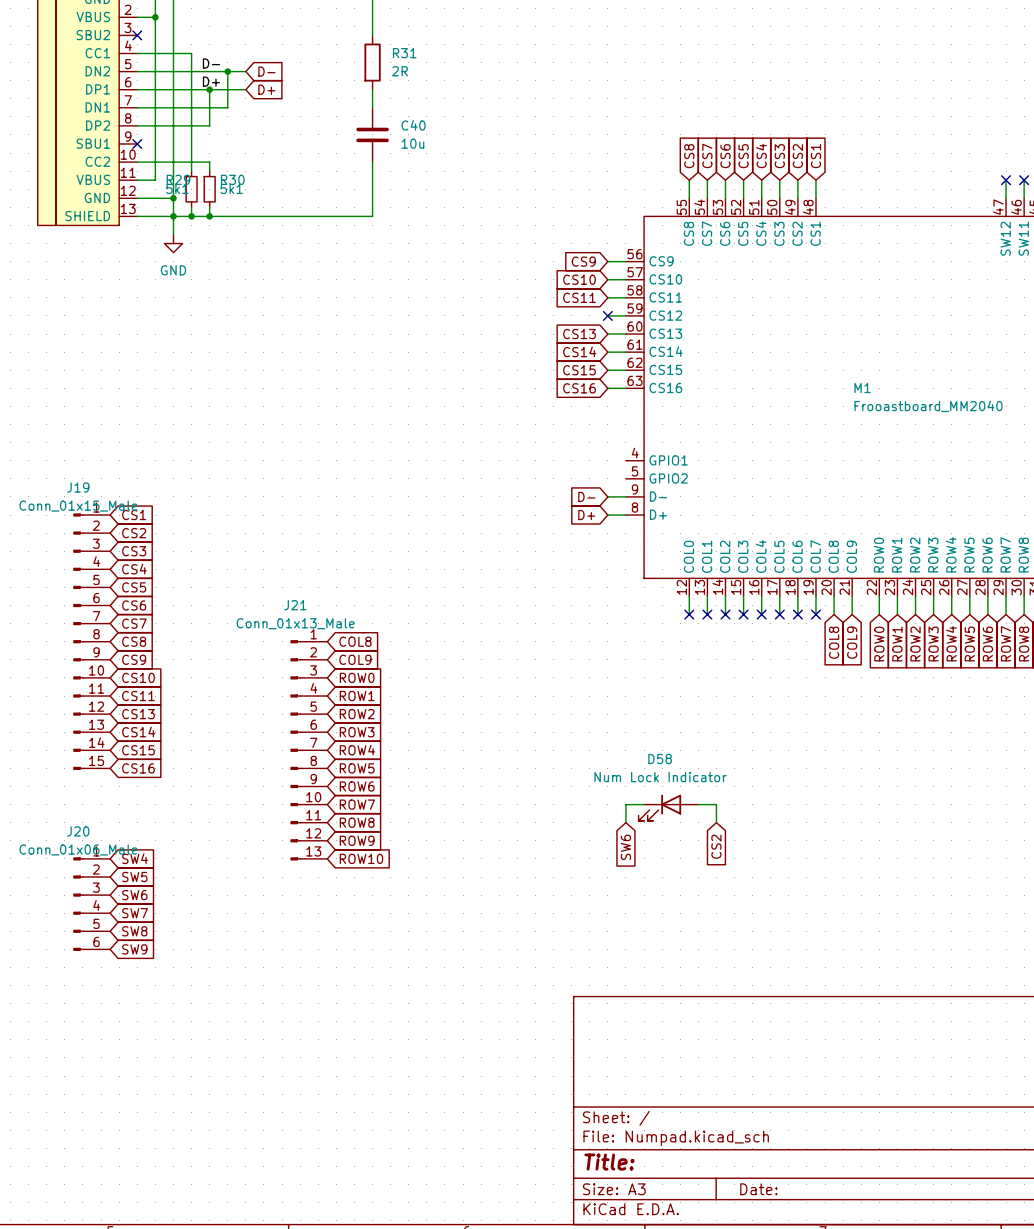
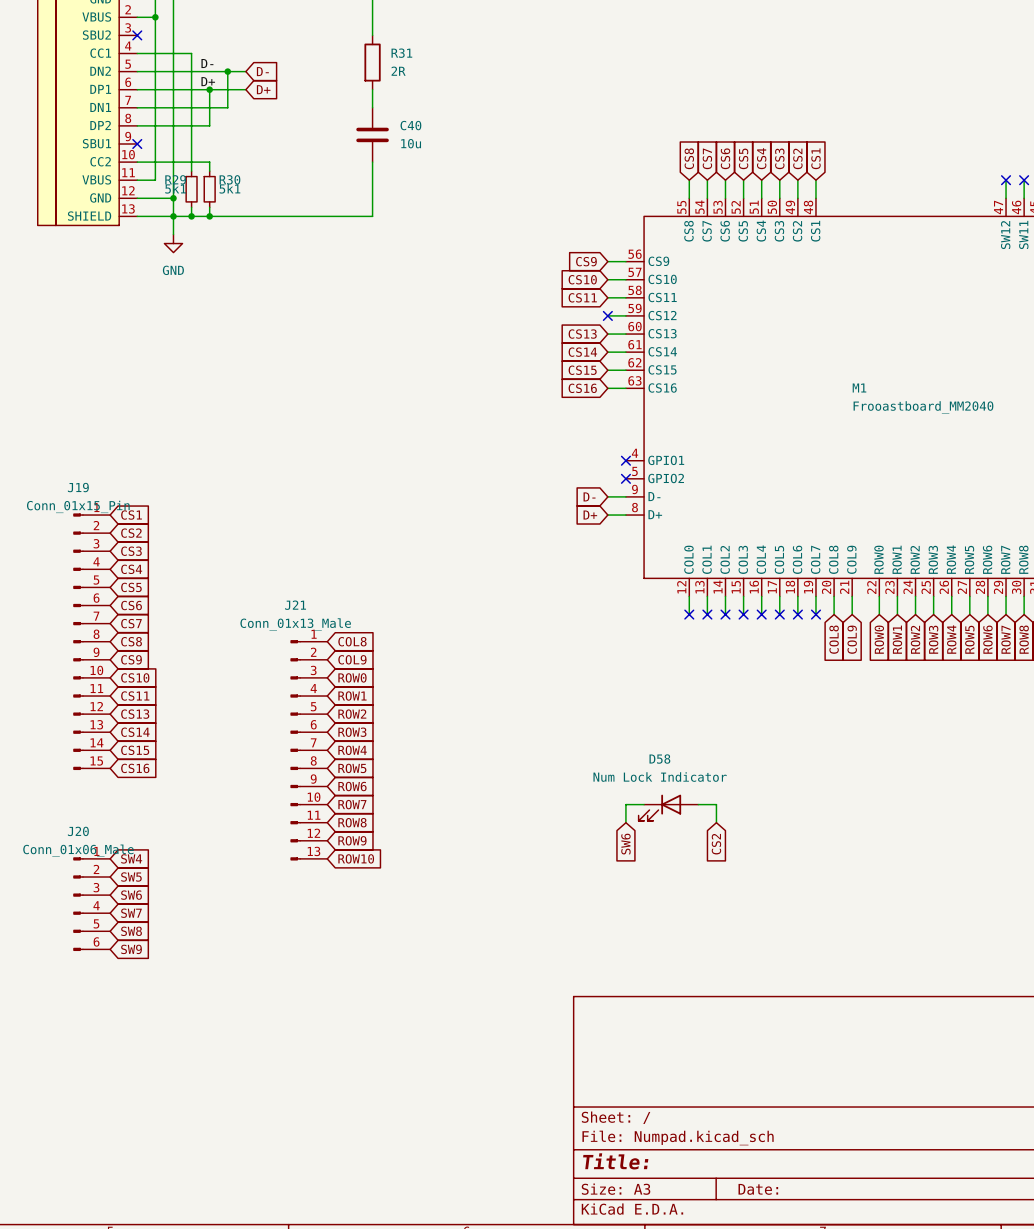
no-connect mark: none -> (625, 460)
no-connect mark: none -> (625, 478)
J19 value: Conn_01x15_Male (78, 506) -> Conn_01x15_Pin (78, 506)

